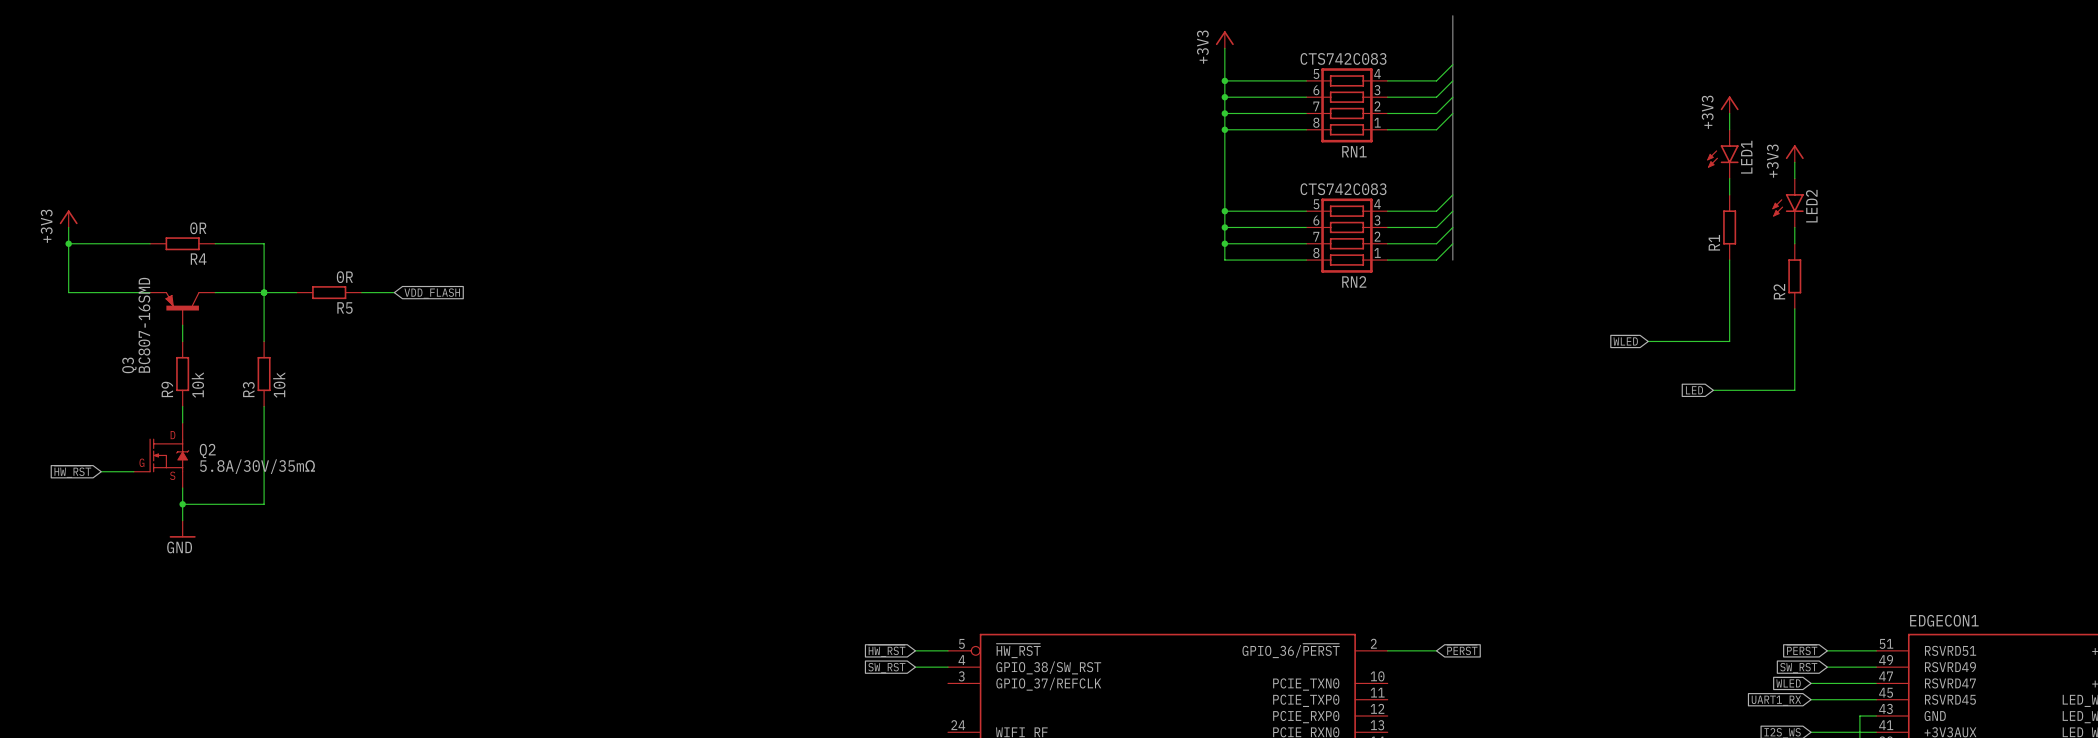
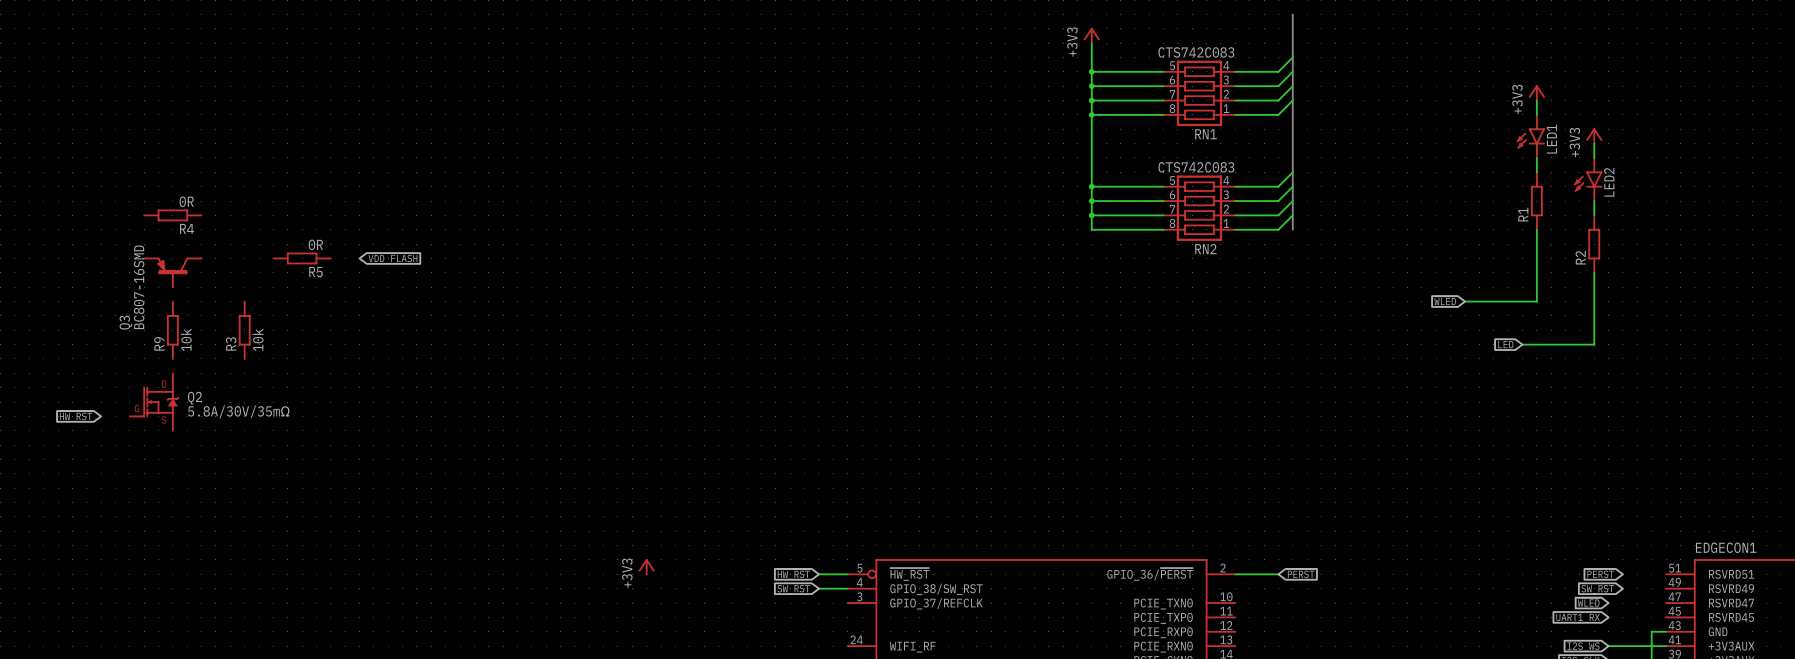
power symbol: +3V3 (68, 218) -> none
wire: (68, 227) (68, 292) (150, 292) -> none
wire: (68, 243) (150, 243) -> none
junction: (68, 243) -> none
wire: (215, 243) (264, 243) (264, 341) -> none
wire: (215, 292) (296, 292) -> none
junction: (264, 292) -> none
wire: (361, 292) (394, 292) -> none
wire: (182, 325) (182, 341) -> none
wire: (182, 406) (182, 422) -> none
wire: (264, 406) (264, 504) (182, 504) -> none
wire: (101, 471) (133, 471) -> none
wire: (182, 488) (182, 520) -> none
junction: (182, 504) -> none
power symbol: GND (182, 529) -> none
power symbol: none -> +3V3 (646, 566)
wire: (1827, 650) (1876, 650) -> none
wire: (1827, 667) (1876, 667) -> none
wire: (1811, 683) (1876, 683) -> none
wire: (1811, 699) (1876, 699) -> none

